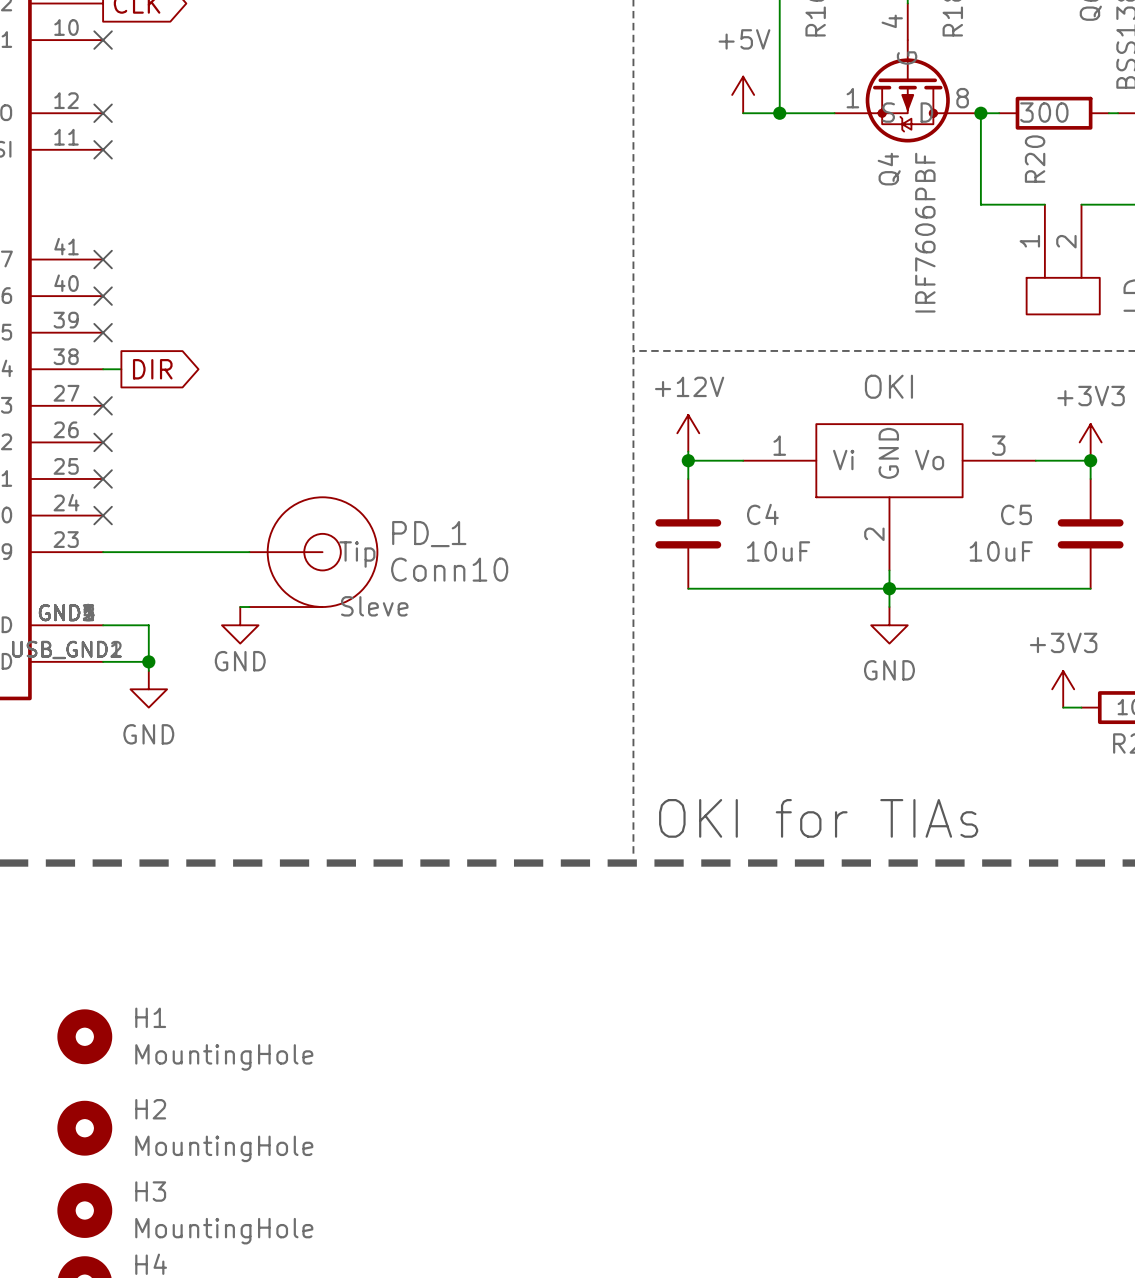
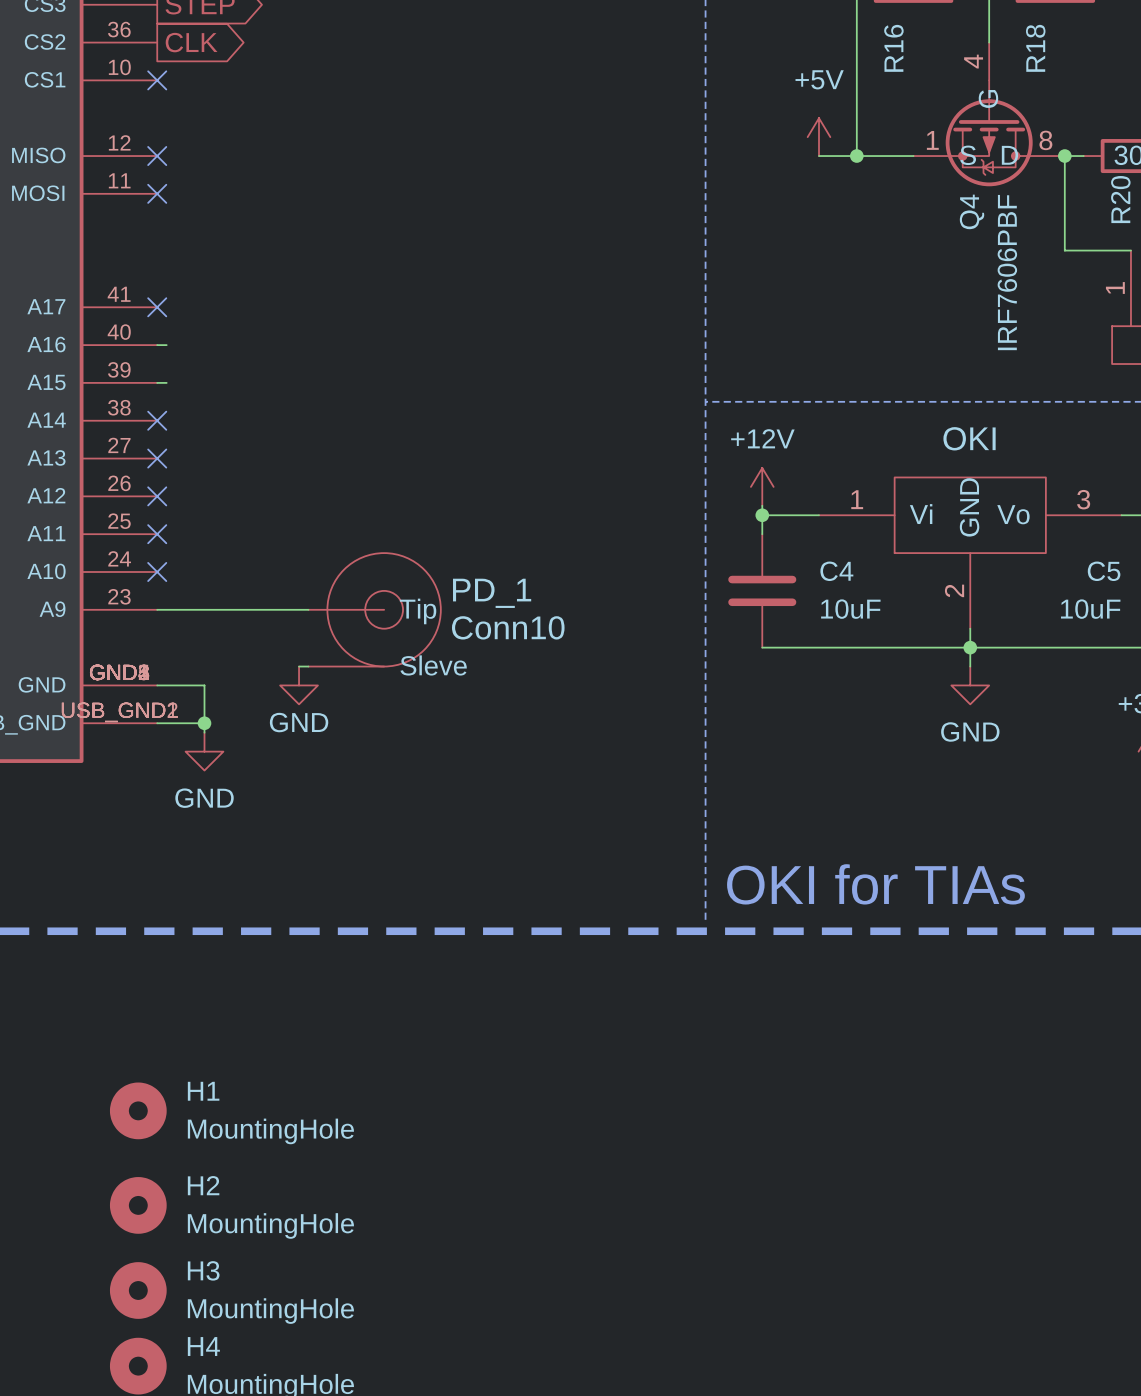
wire: none -> (157, 345) (166, 345)
no-connect mark: (103, 296) -> none
wire: none -> (157, 382) (166, 382)
no-connect mark: (103, 332) -> none
wire: (103, 369) (121, 369) -> none
no-connect mark: none -> (157, 420)
global label: DIR (152, 369) -> none

